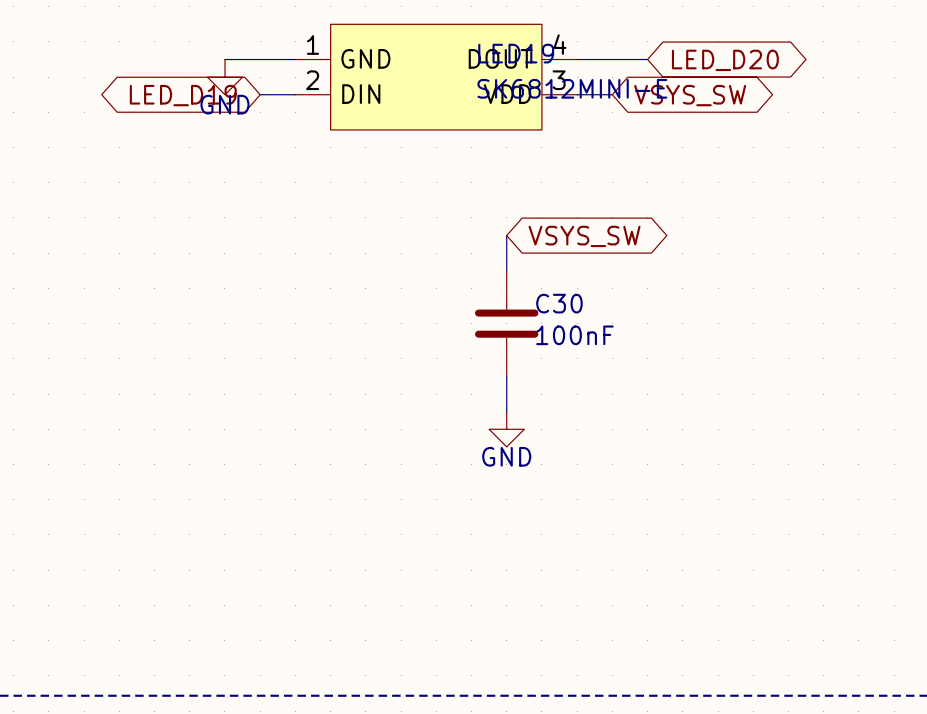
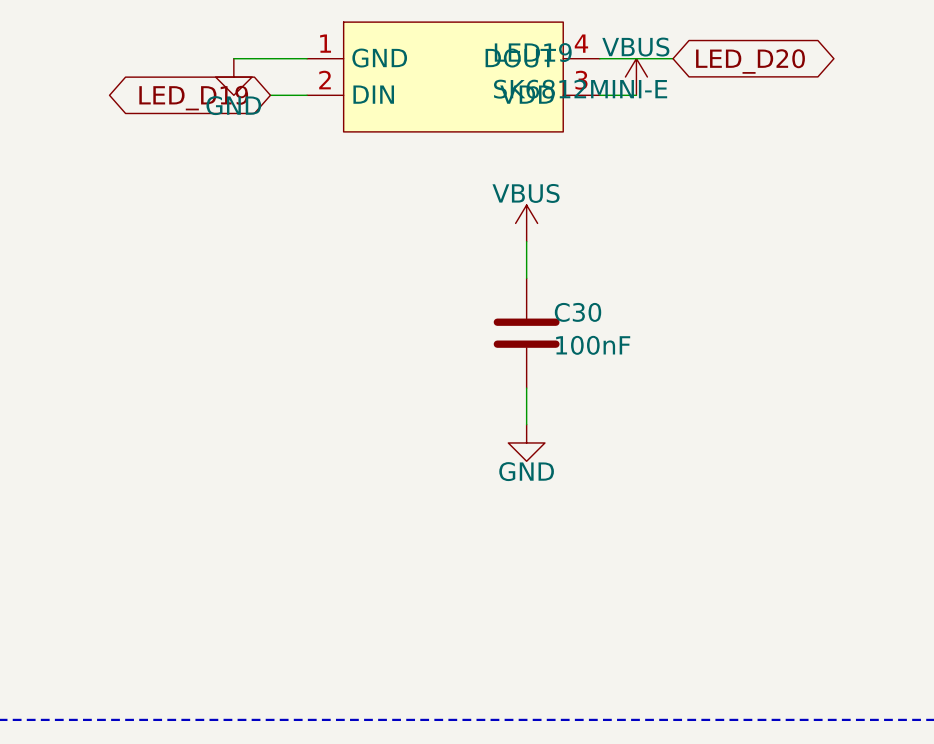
power symbol: none -> VBUS (636, 77)
global label: VSYS_SW (690, 95) -> none
power symbol: none -> VBUS (526, 223)
global label: VSYS_SW (584, 236) -> none

